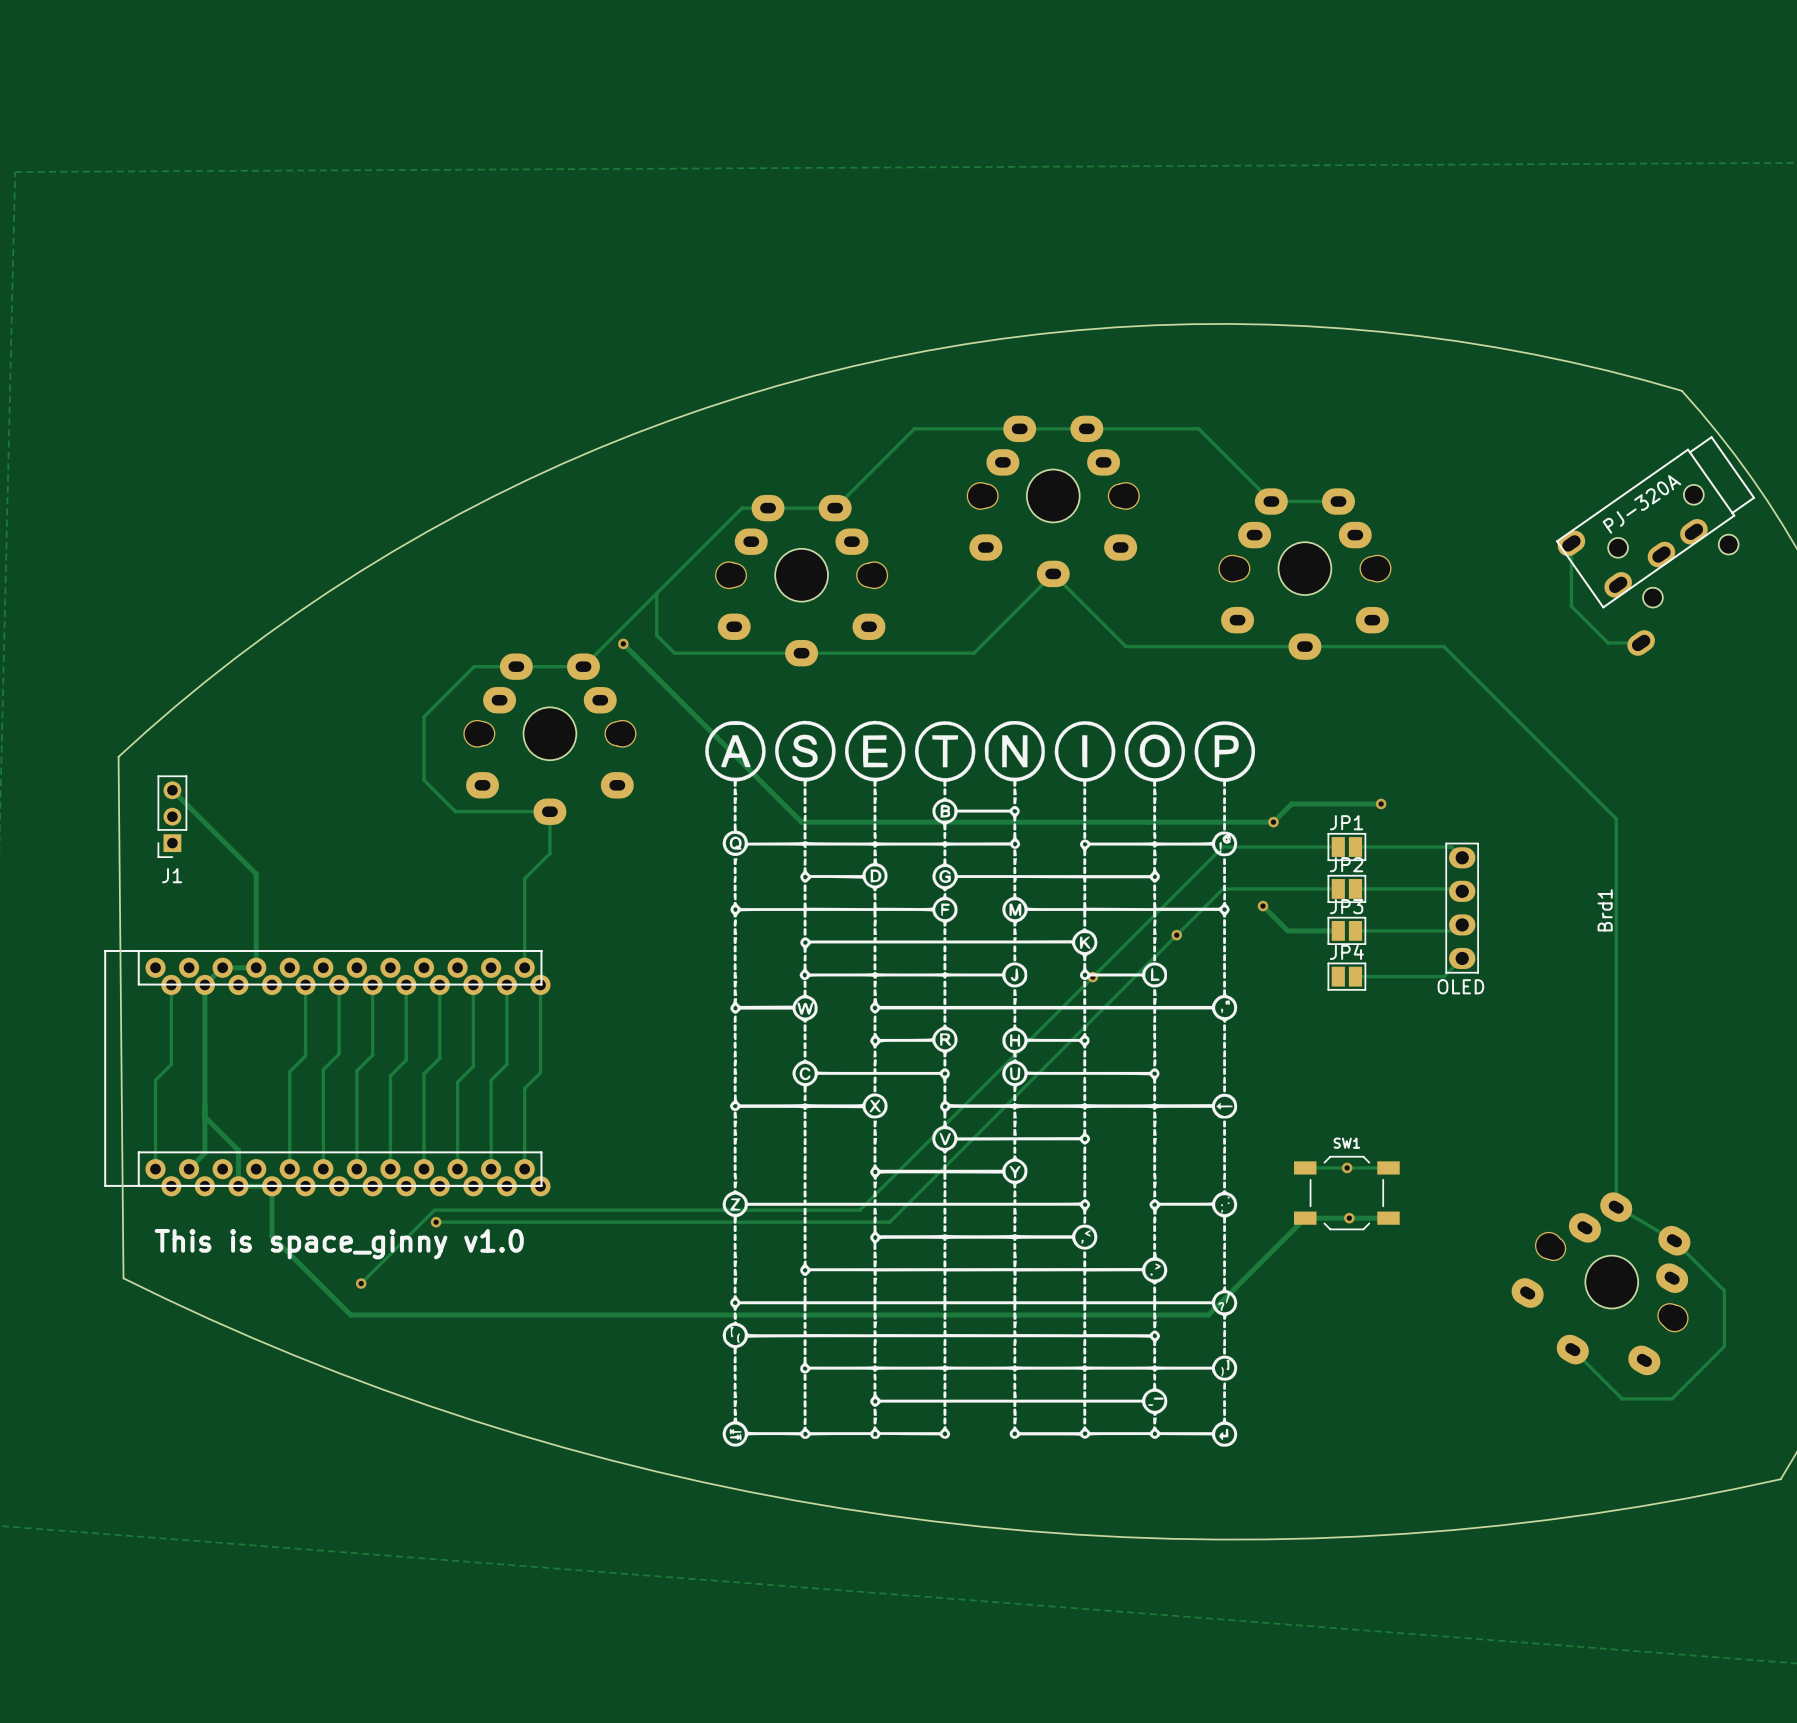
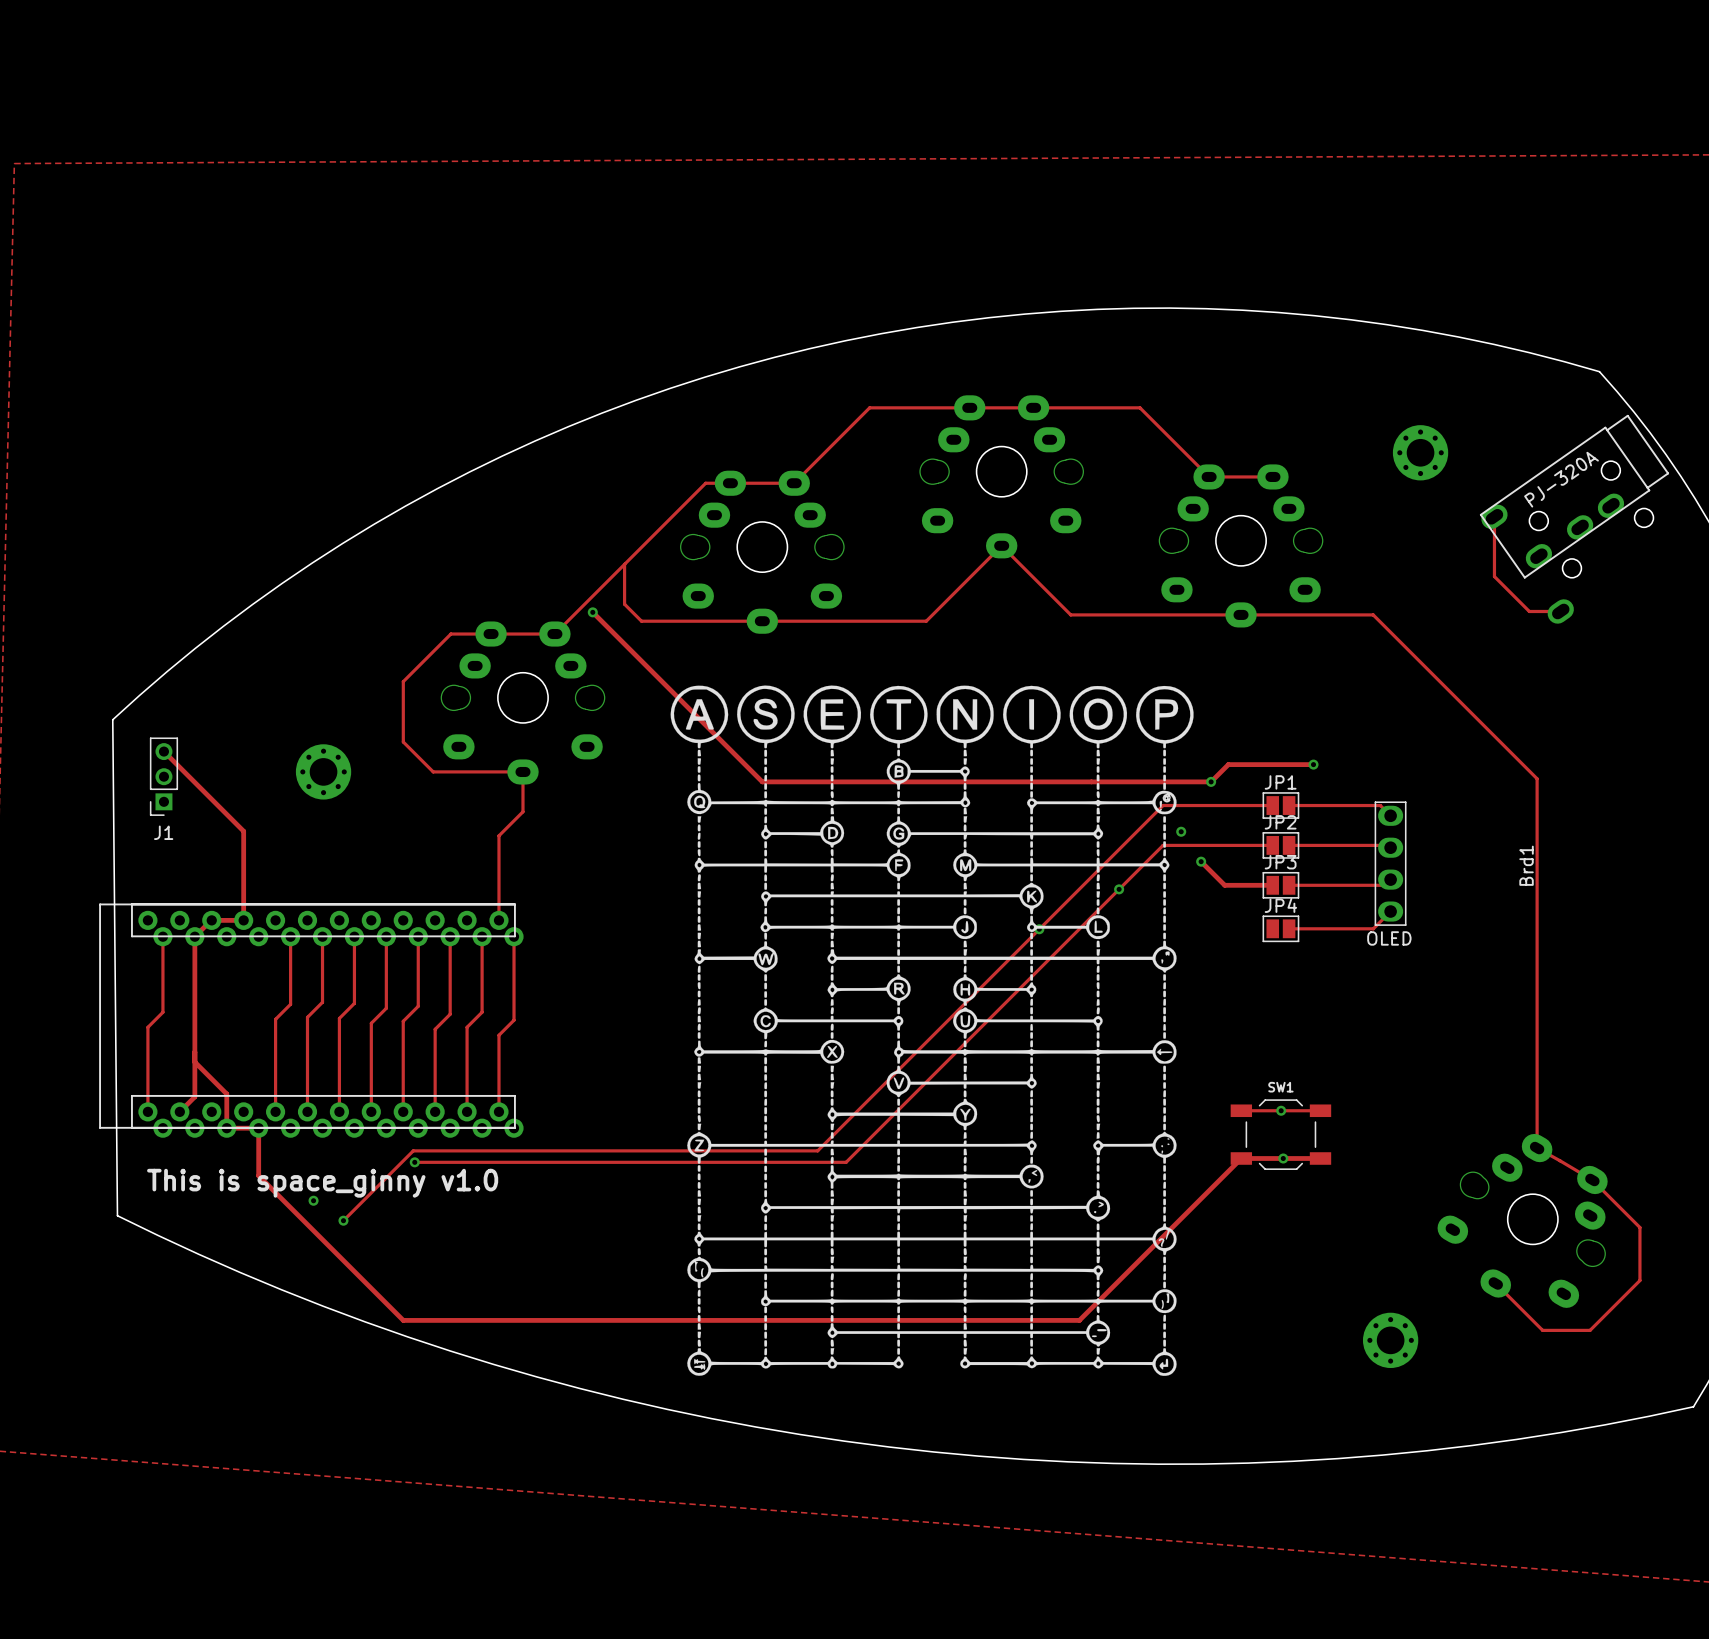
part: none -> (1420, 452)
part: none -> (323, 771)
via: none -> (1181, 831)
via: none -> (313, 1200)
track: (350, 1315) (1208, 1315) -> (333, 1250) (403, 1320) (1079, 1320) (1149, 1250)
part: none -> (1390, 1340)

